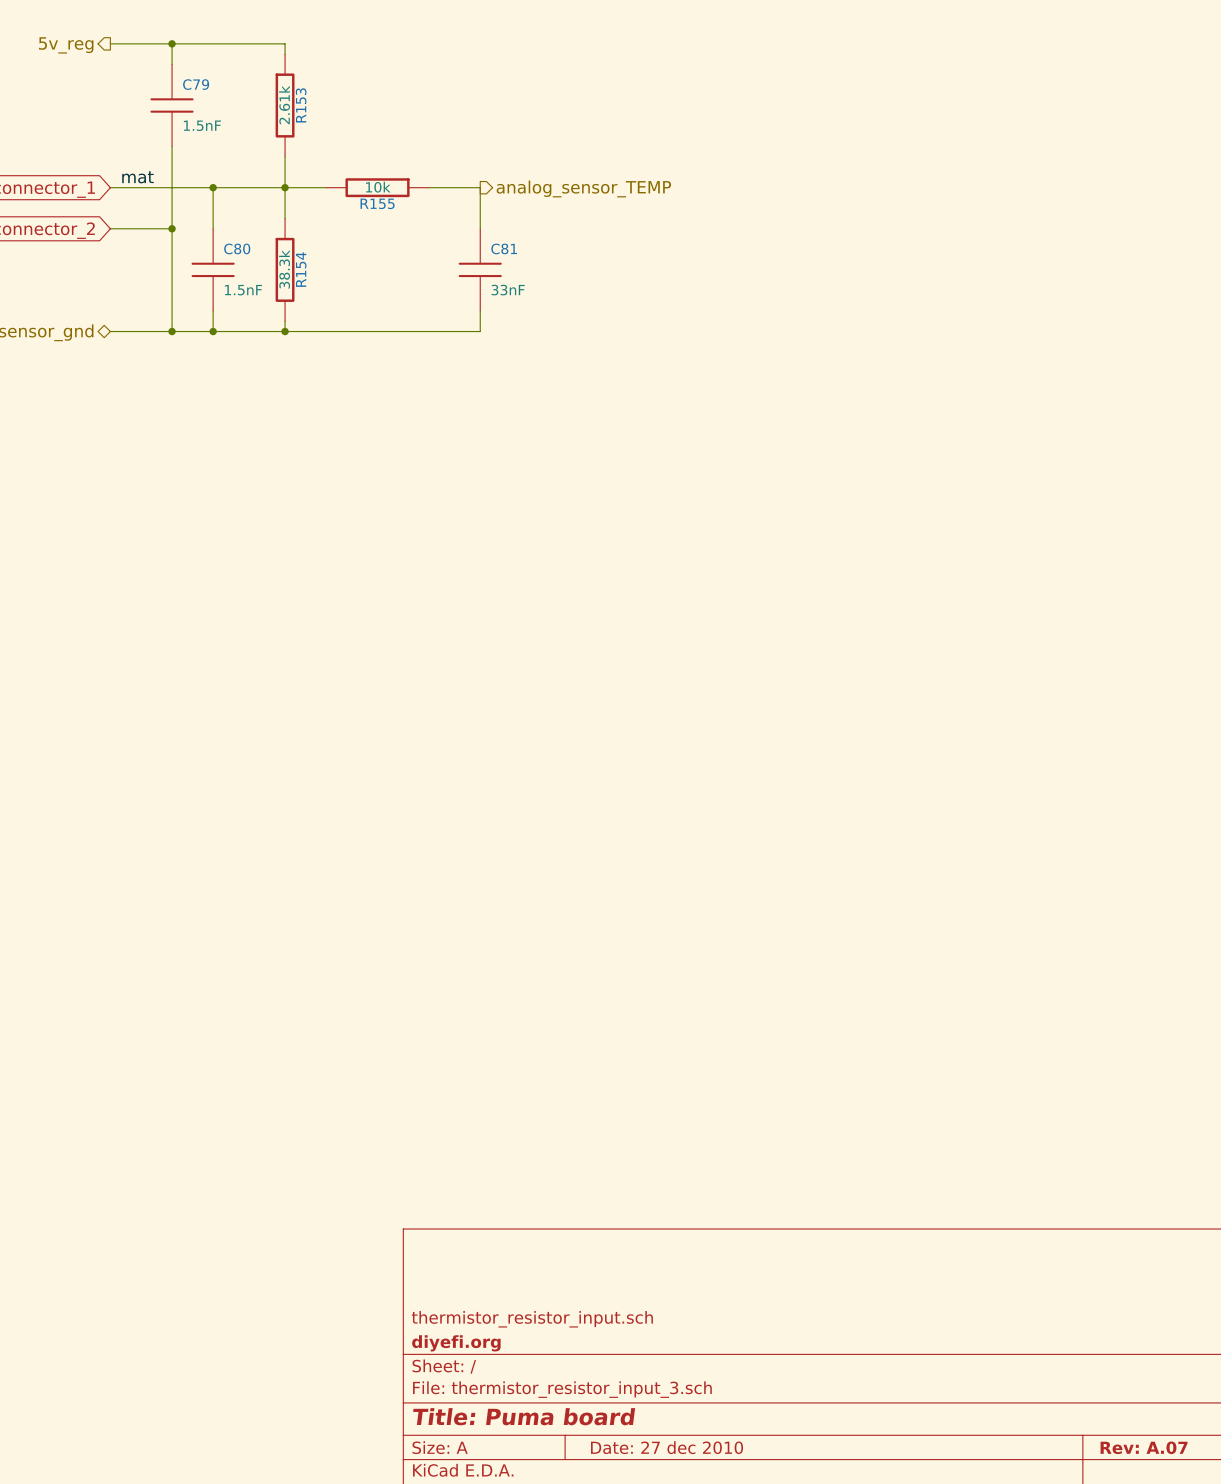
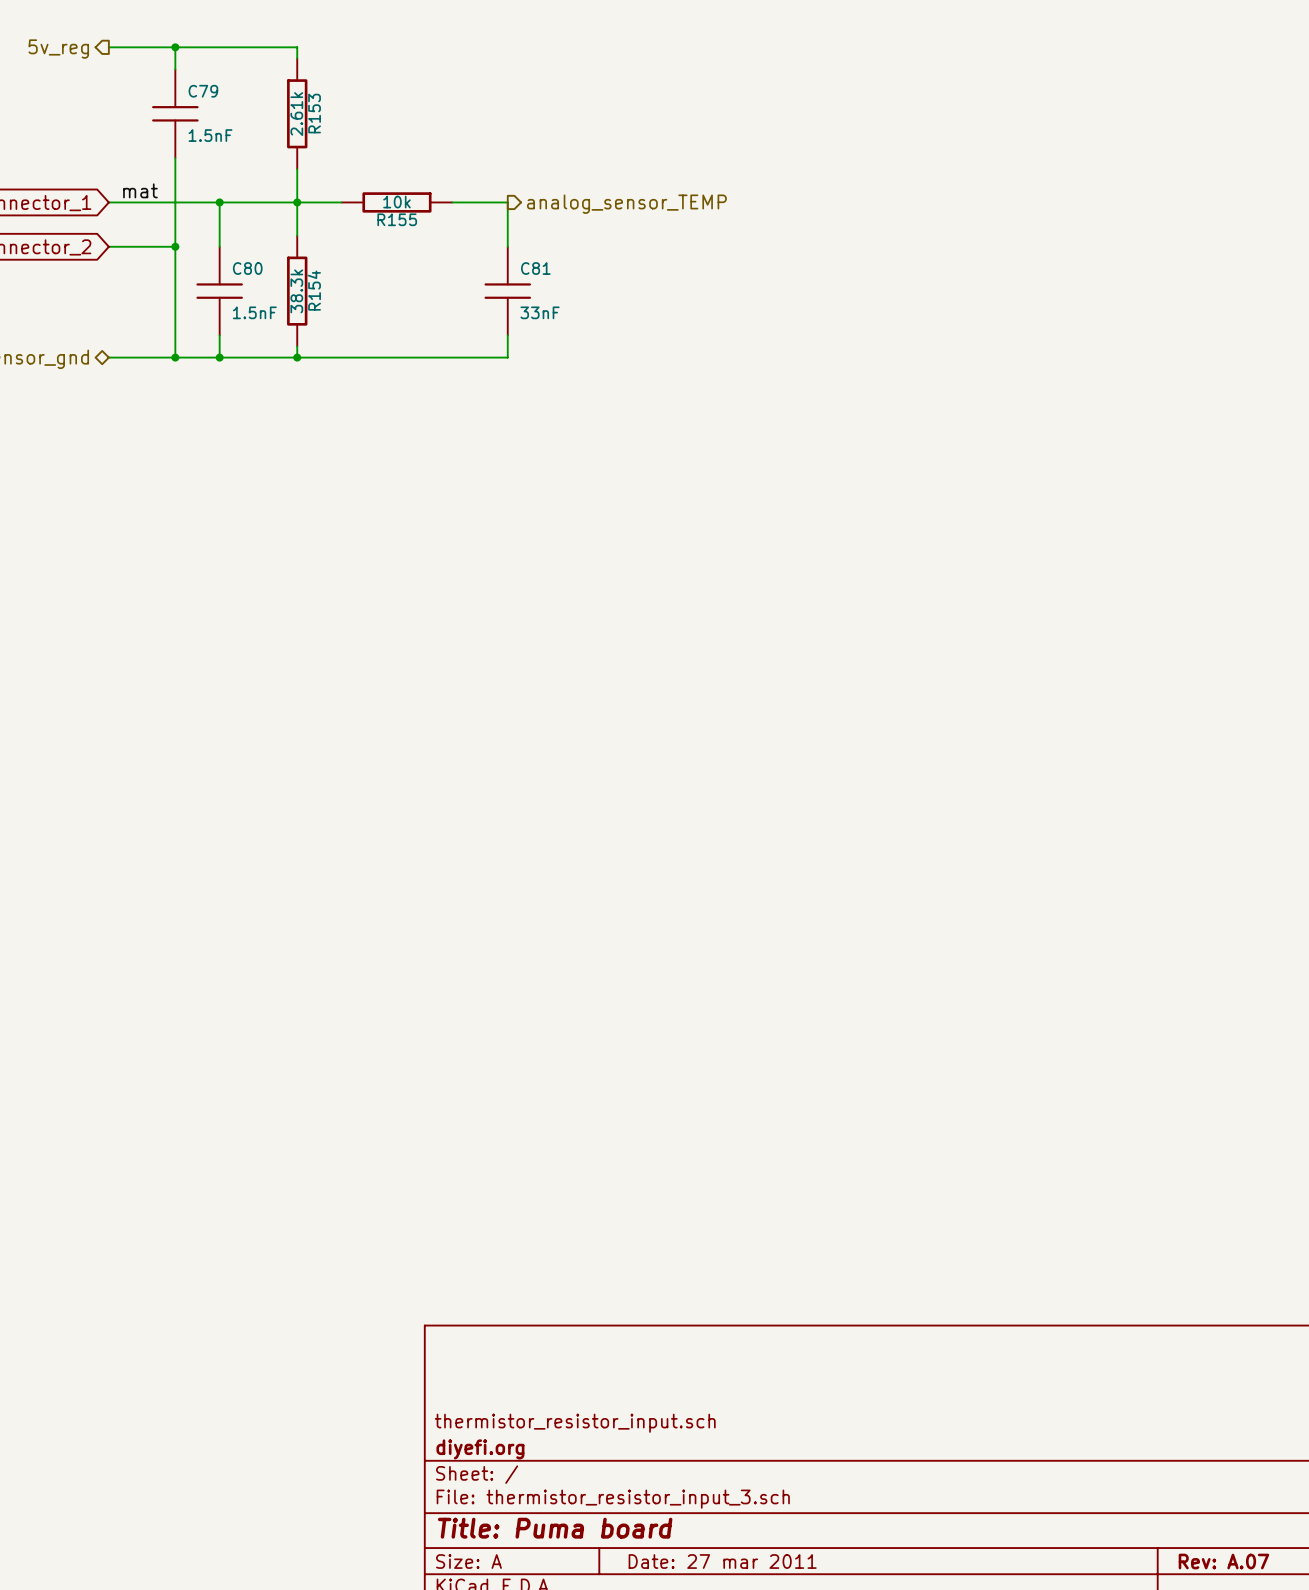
title block: Date: 27 dec 2010 (667, 1447) -> Date: 27 mar 2011 (722, 1561)

